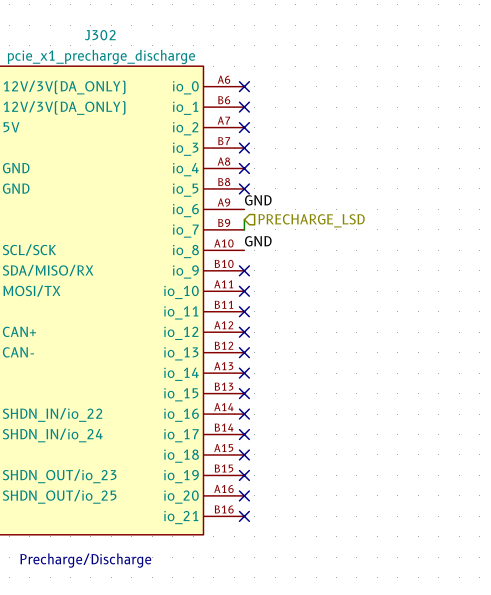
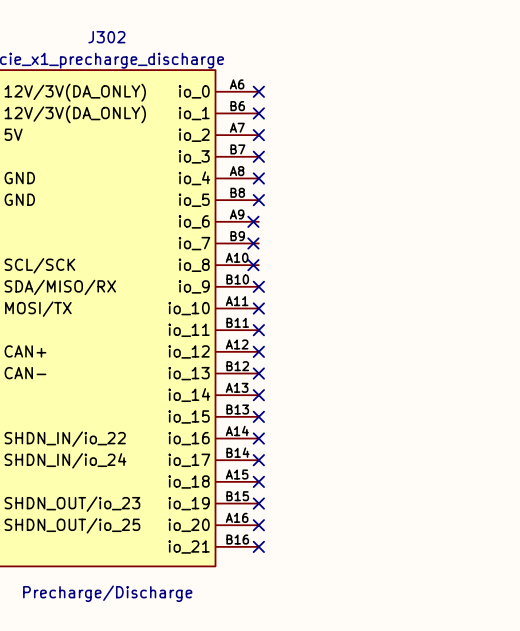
label: GND (258, 200) -> none
no-connect mark: none -> (253, 221)
wire: (244, 219) (244, 229) -> none
hierarchical label: PRECHARGE_LSD (311, 220) -> none
no-connect mark: none -> (253, 243)
label: GND (258, 241) -> none
no-connect mark: none -> (253, 265)

